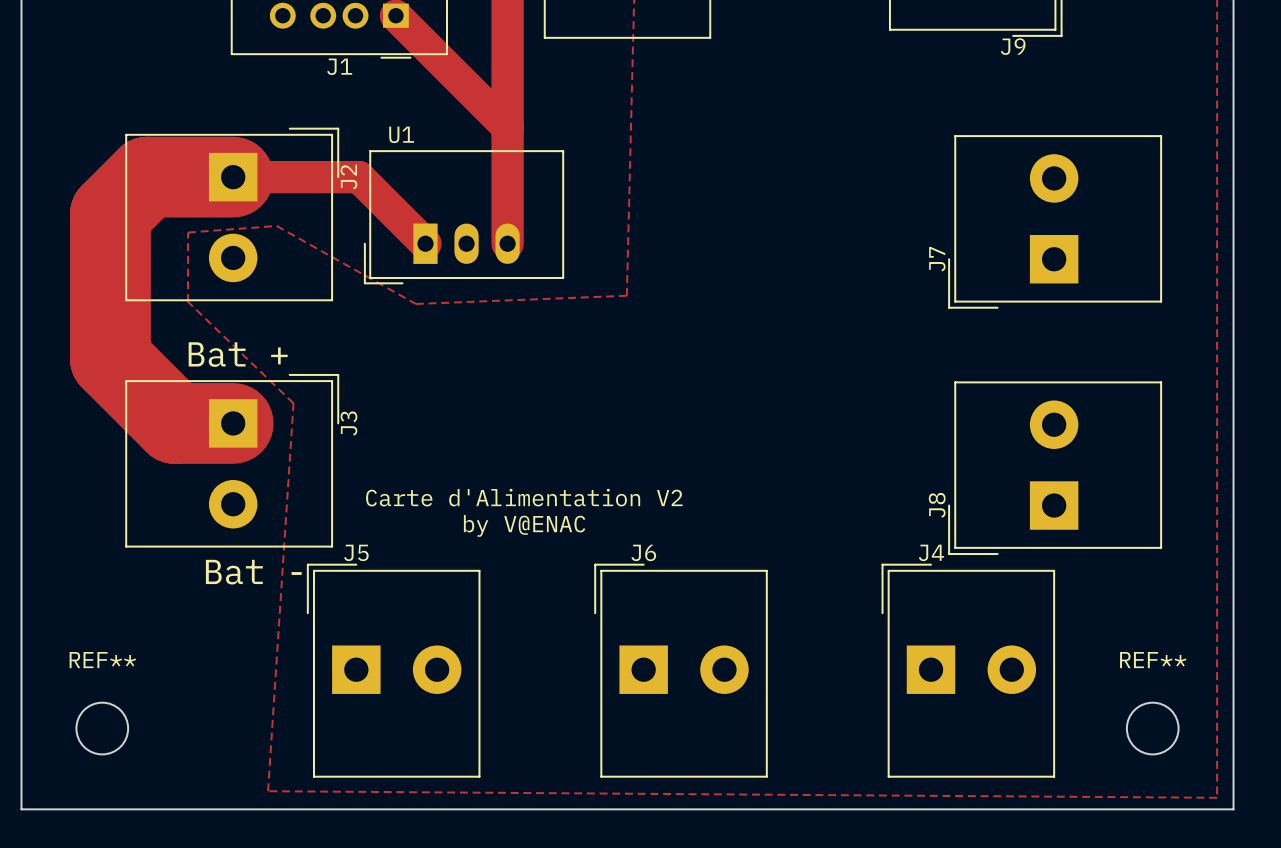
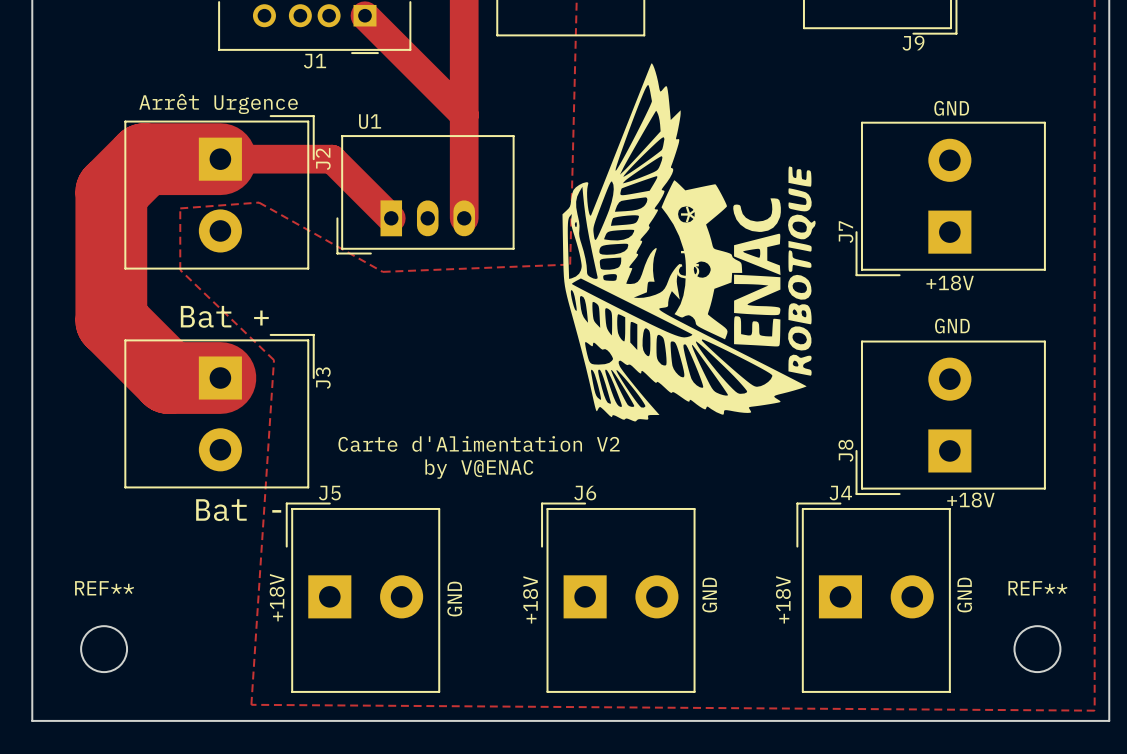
text: none -> Arrêt Urgence (218, 103)
text: none -> GND (951, 108)
part: none -> (689, 242)
text: none -> +18V (950, 283)
text: none -> GND (952, 326)
text: none -> +18V (970, 500)
text: none -> GND (709, 595)
text: none -> GND (964, 595)
text: none -> +18V (277, 597)
text: none -> GND (454, 599)
text: none -> +18V (530, 599)
text: none -> +18V (783, 599)

